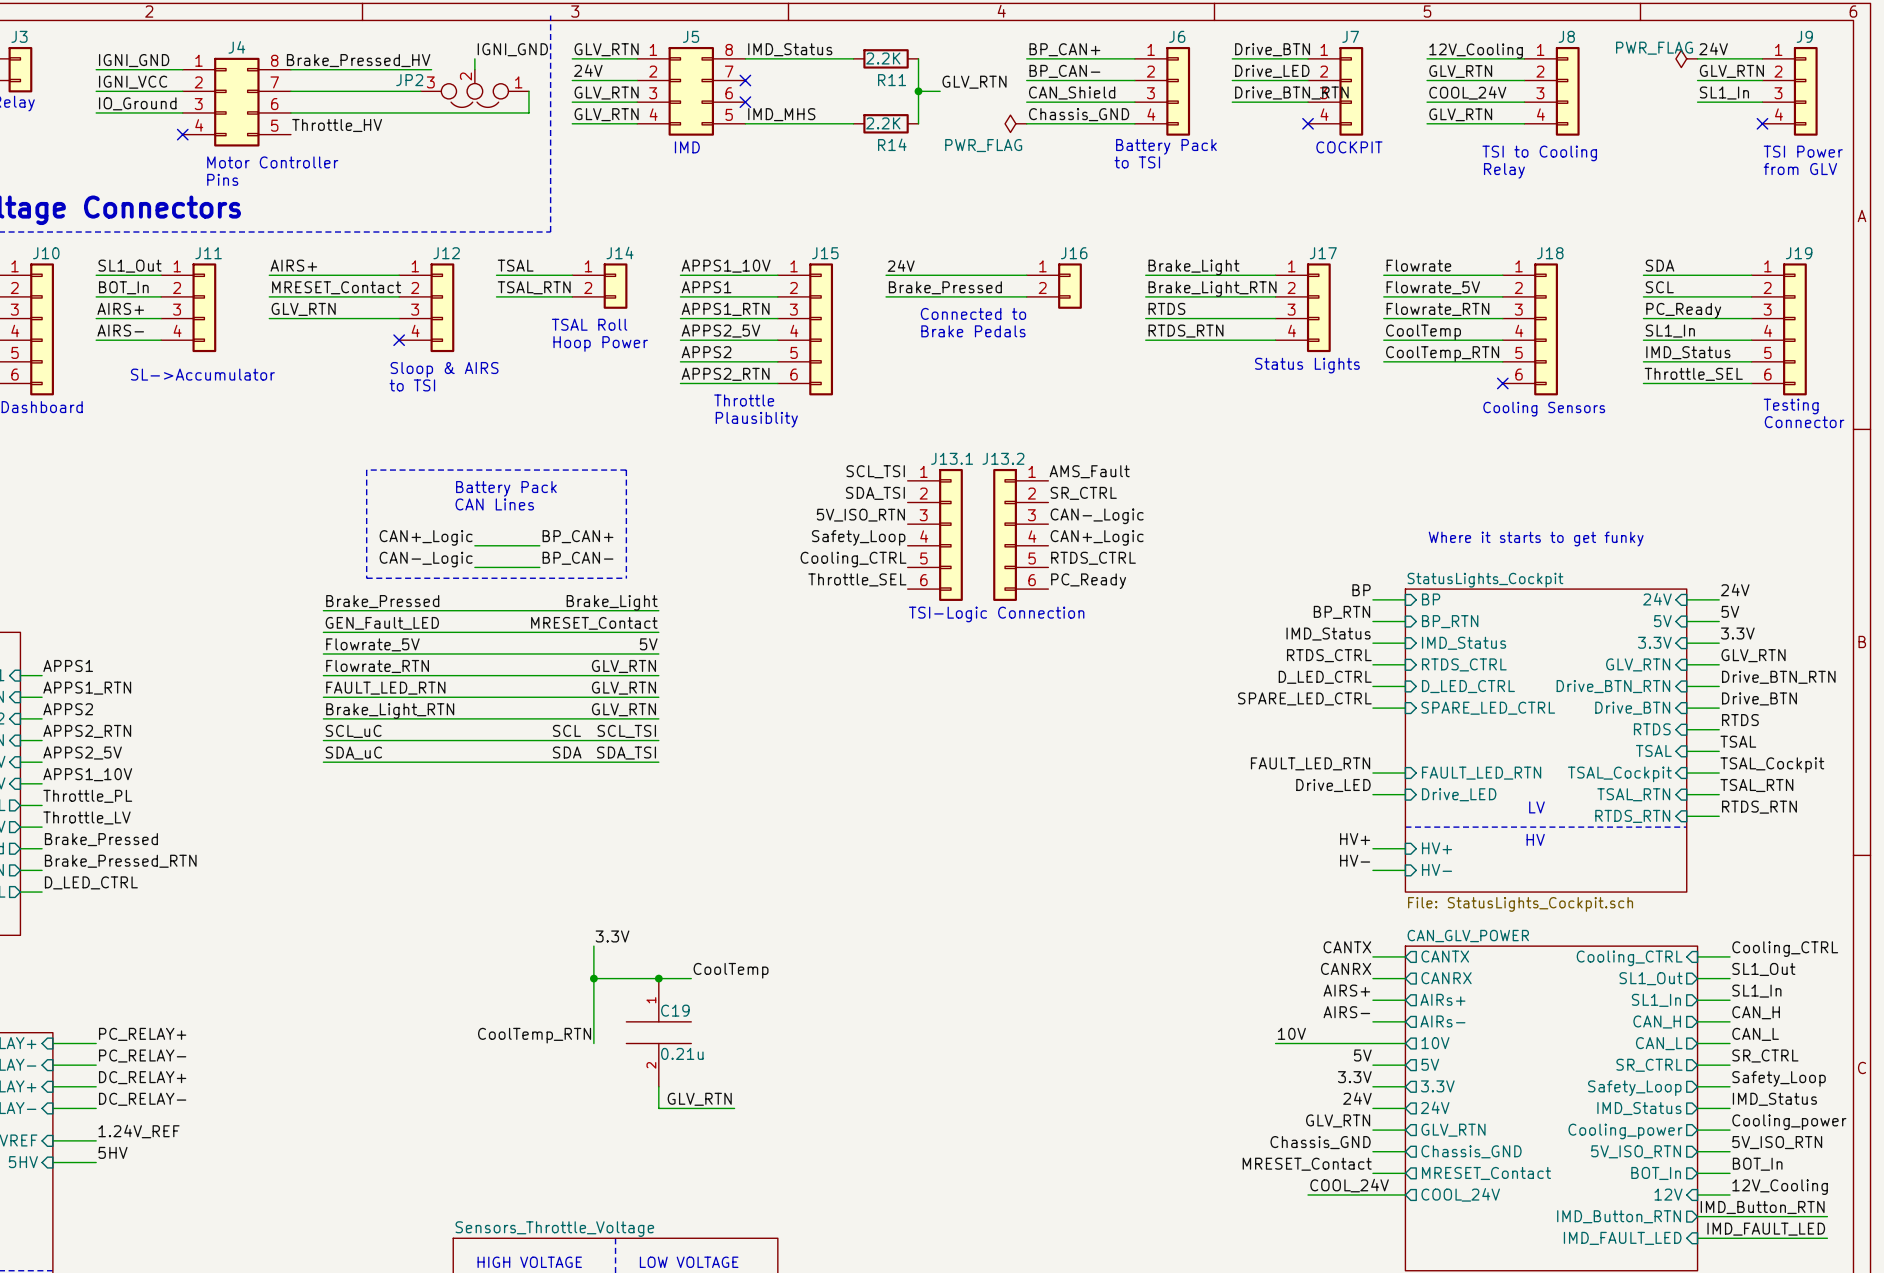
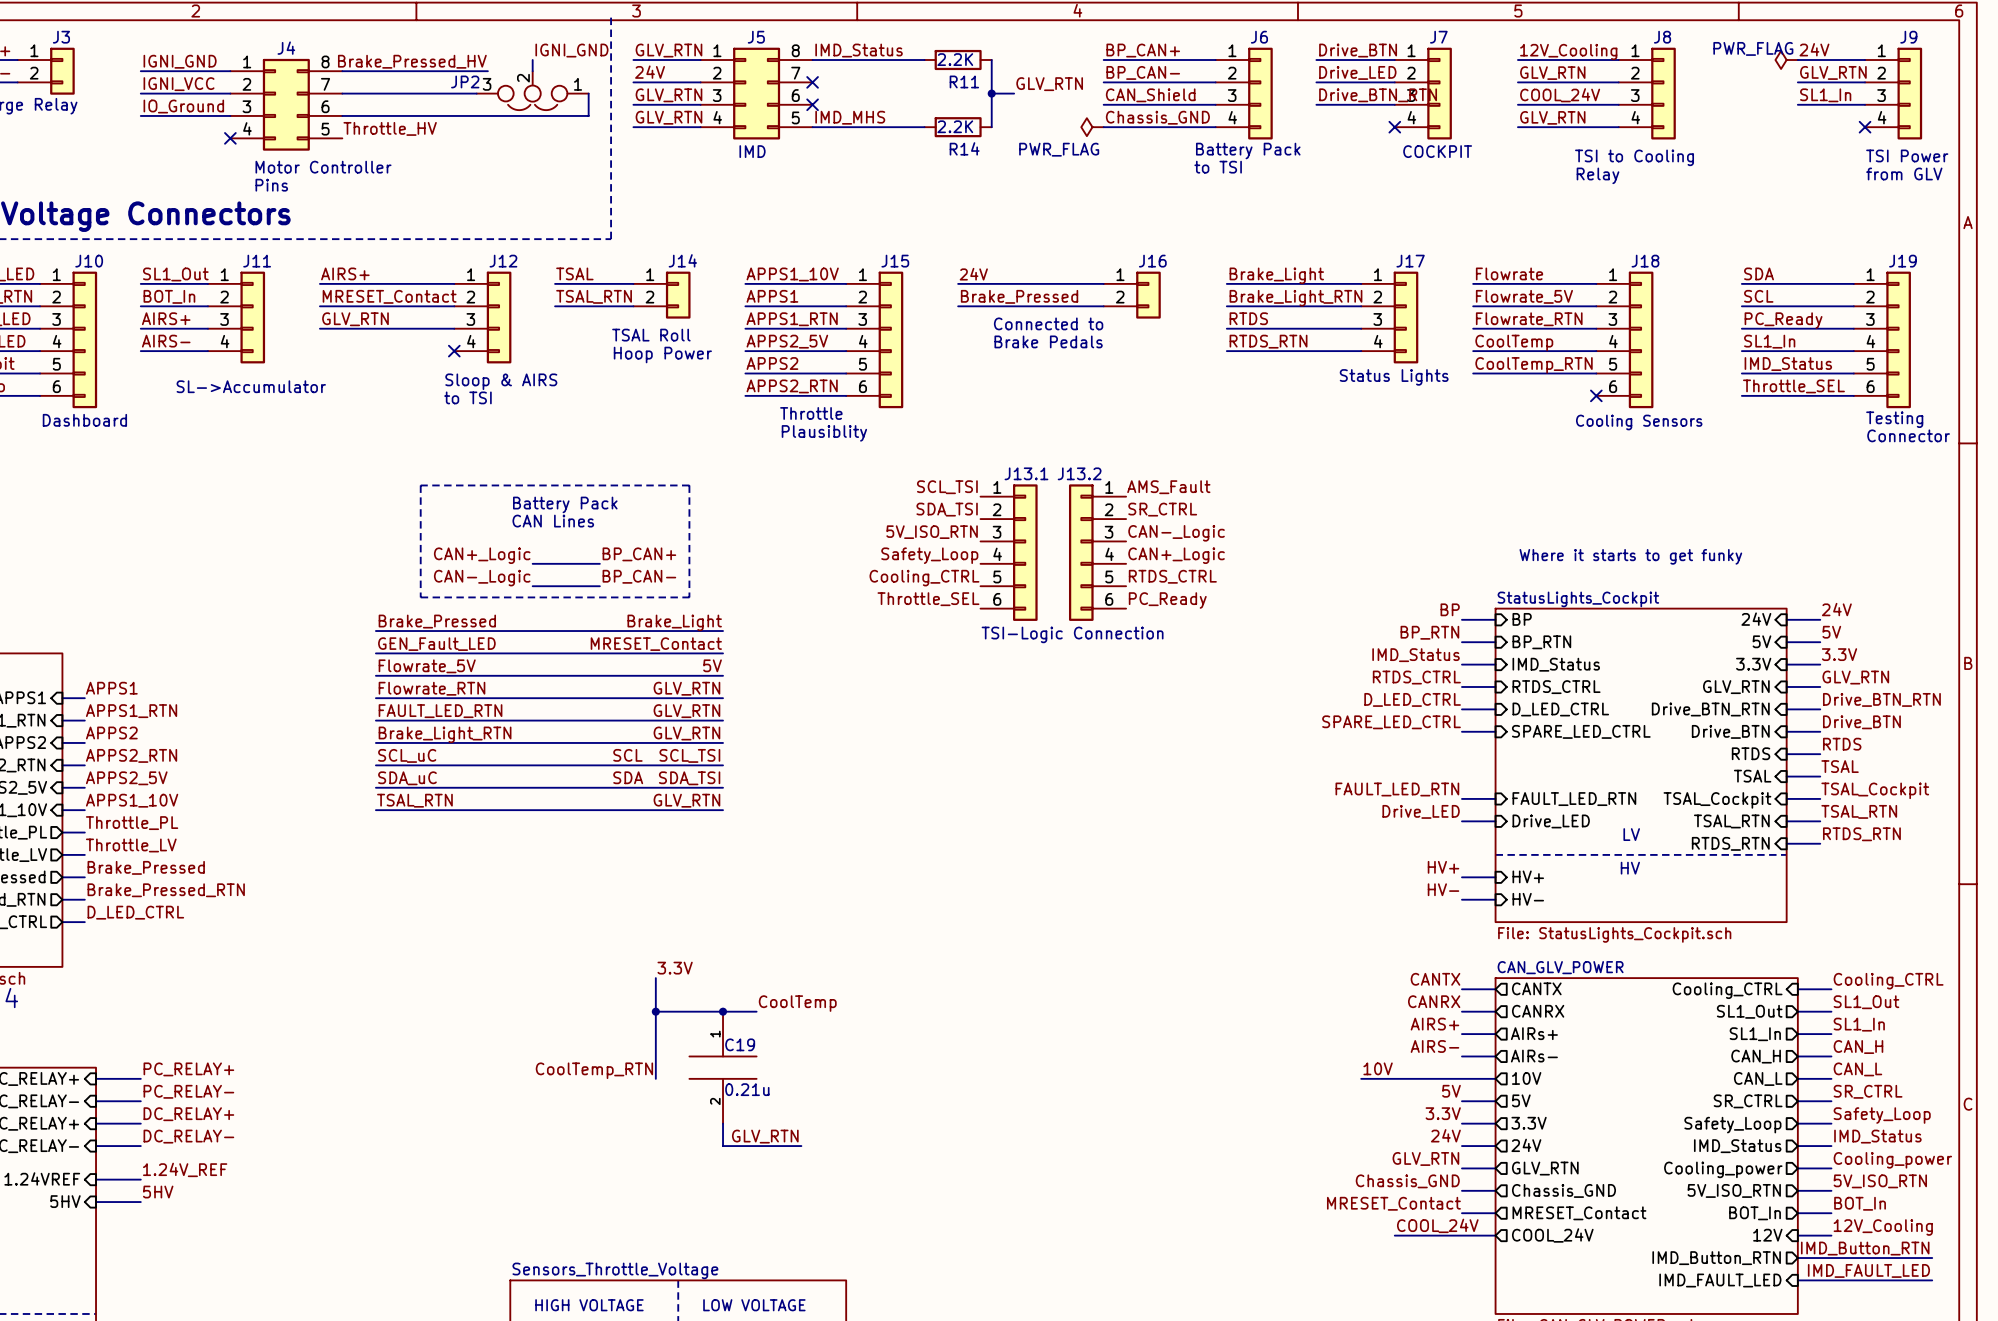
label: none -> TSAL_RTN (414, 800)
label: none -> GLV_RTN (686, 800)
wire: none -> (375, 810) (723, 810)

